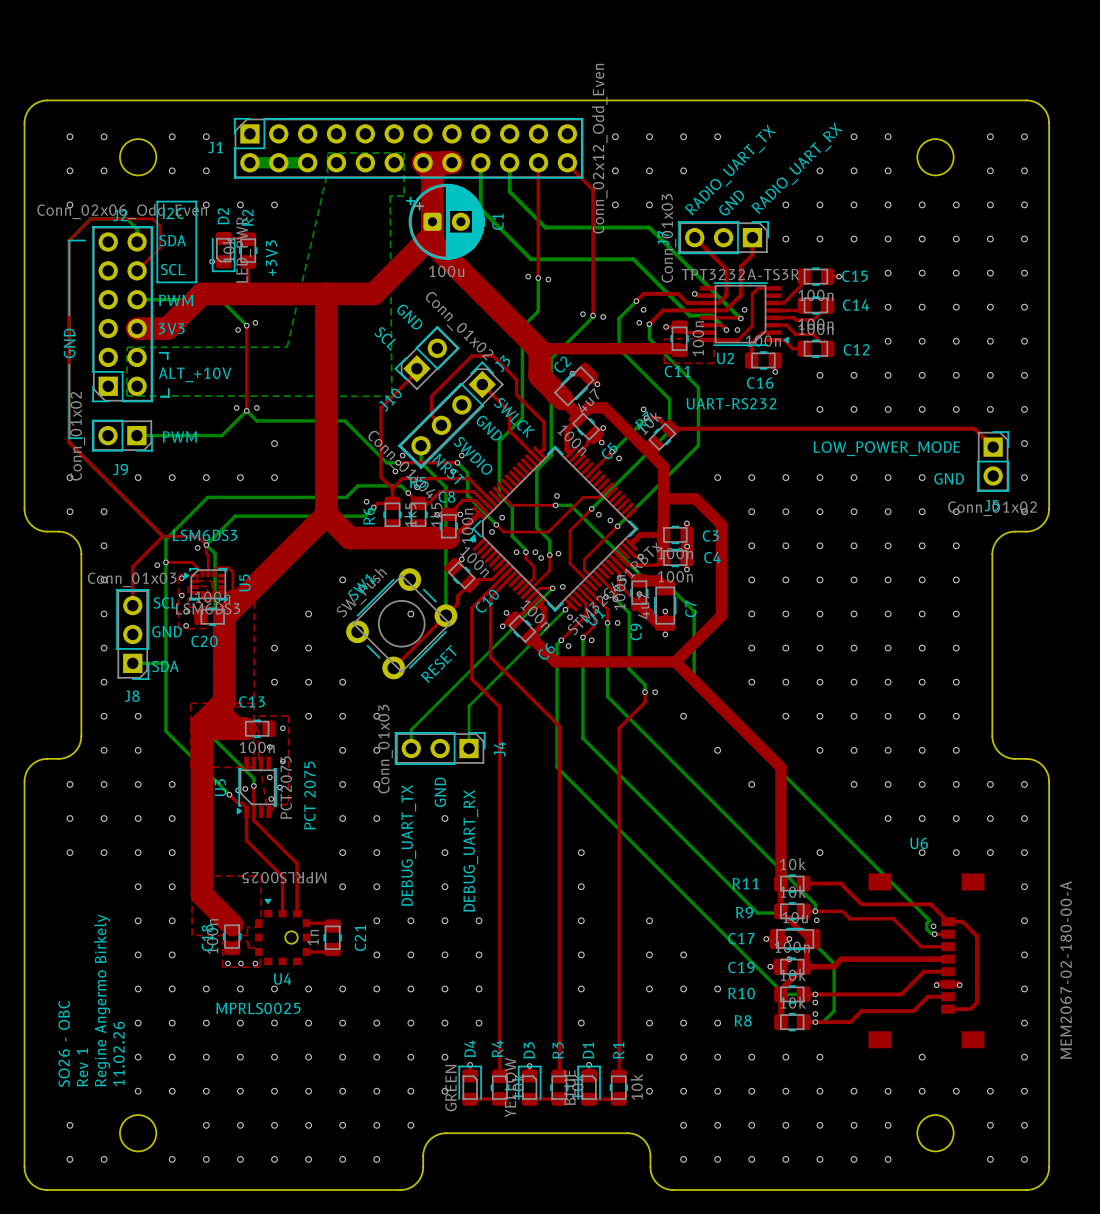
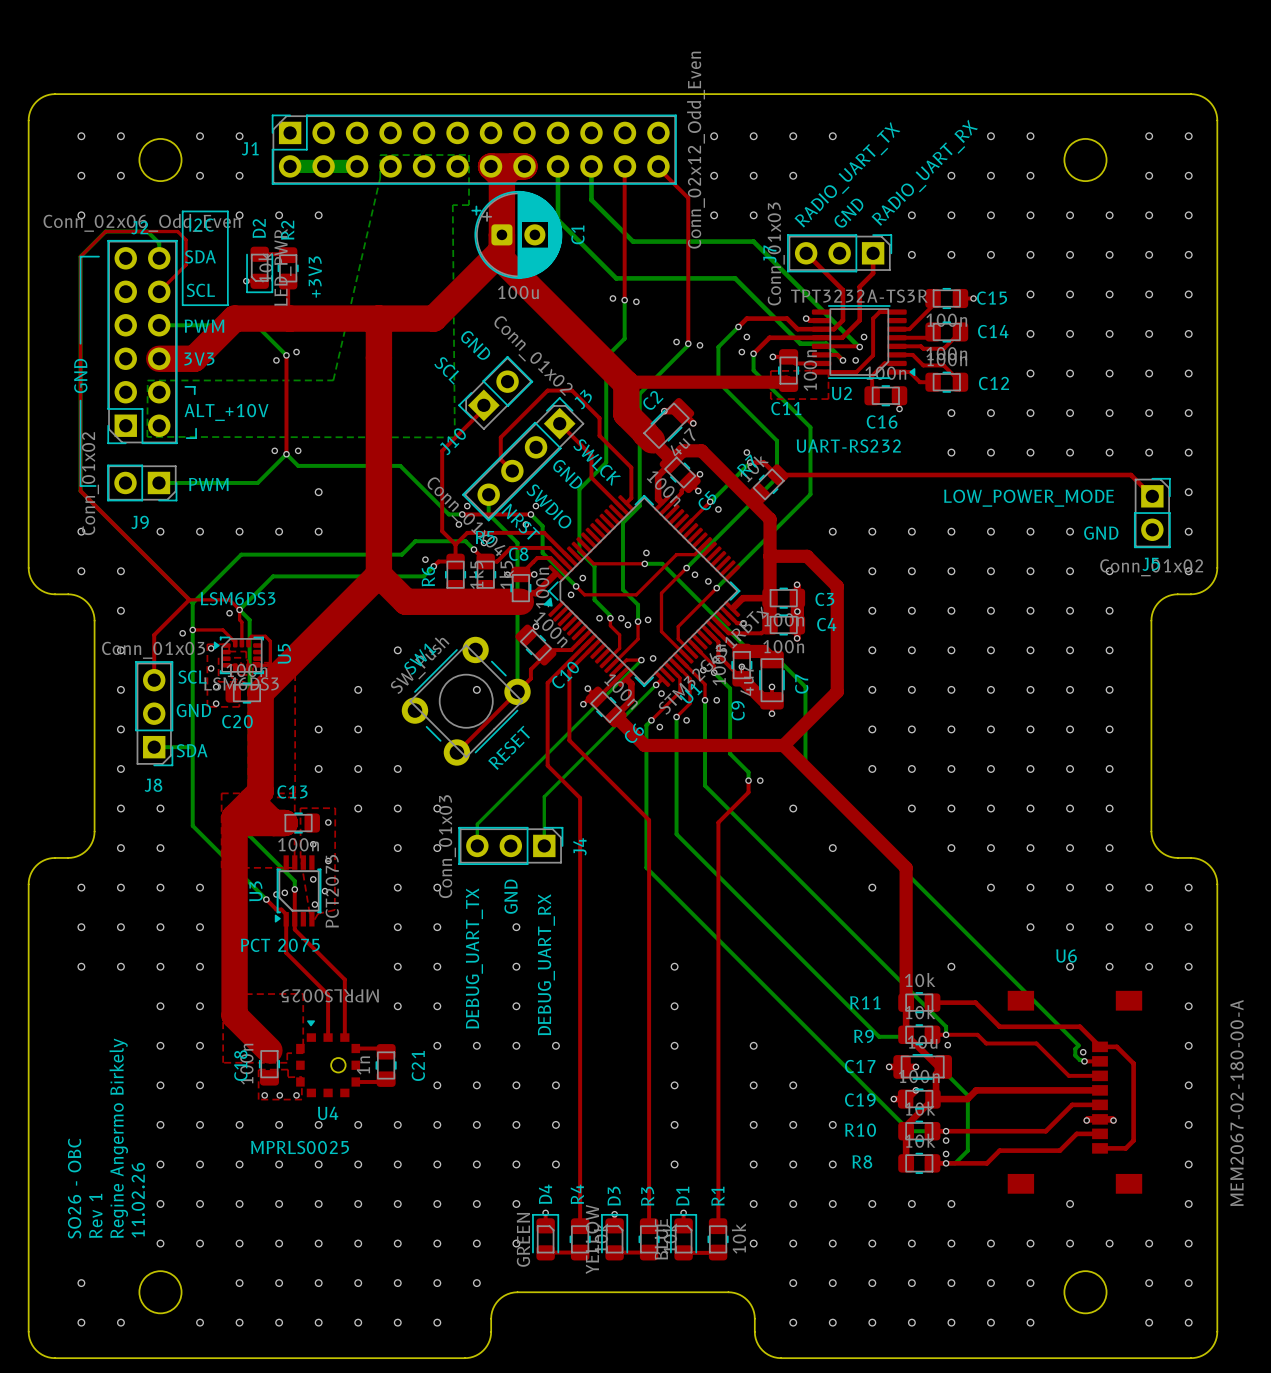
text rotation: 0° (309, 795) -> 90° clockwise (280, 945)

